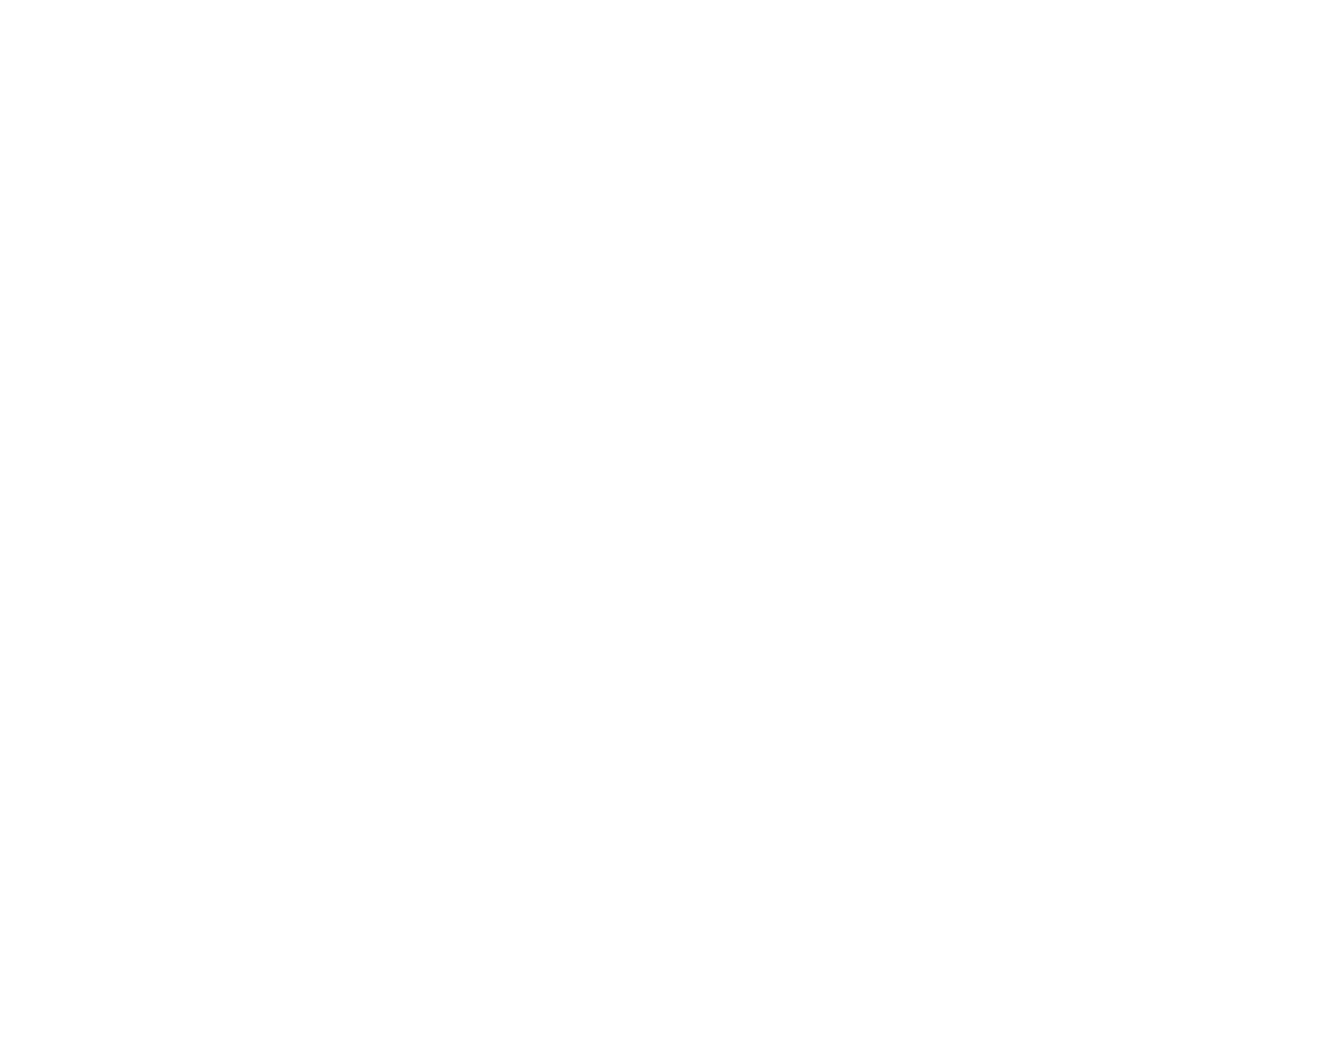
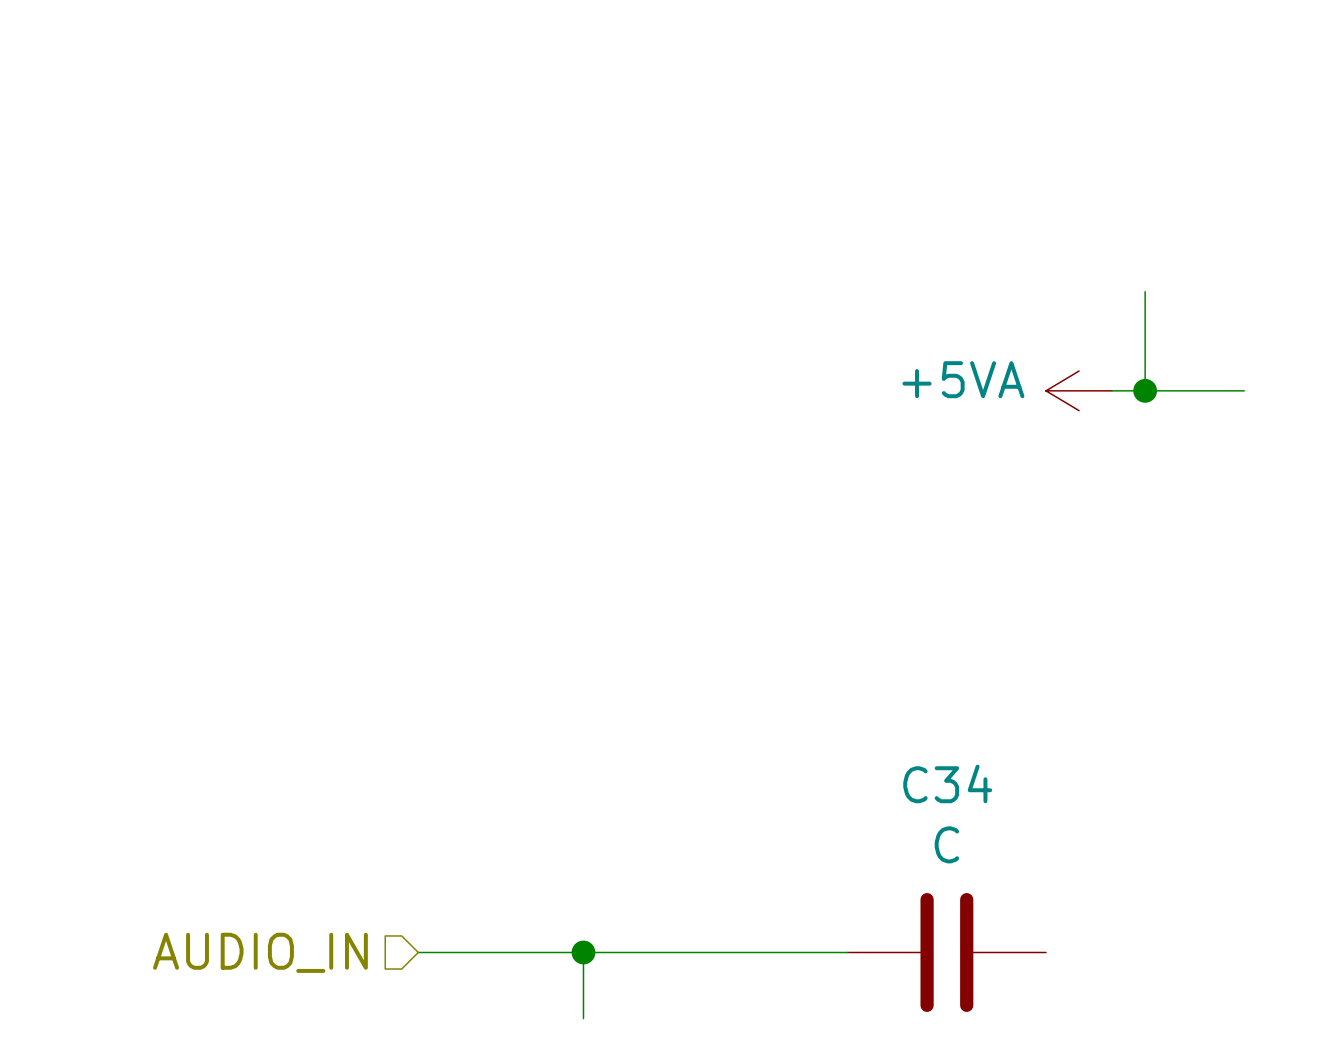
wire: none -> (1145, 291) (1145, 390)
power symbol: none -> +5VA (1079, 390)
wire: none -> (1112, 390) (1244, 390)
junction: none -> (1145, 390)
hierarchical label: none -> AUDIO_IN (260, 952)
wire: none -> (418, 952) (847, 952)
wire: none -> (583, 952) (583, 1018)
junction: none -> (583, 952)
C34: none -> C (946, 952)

